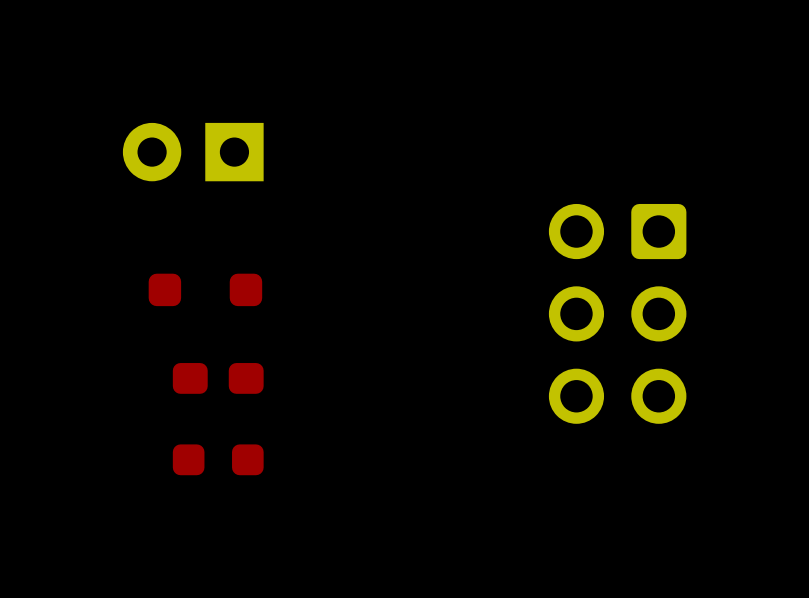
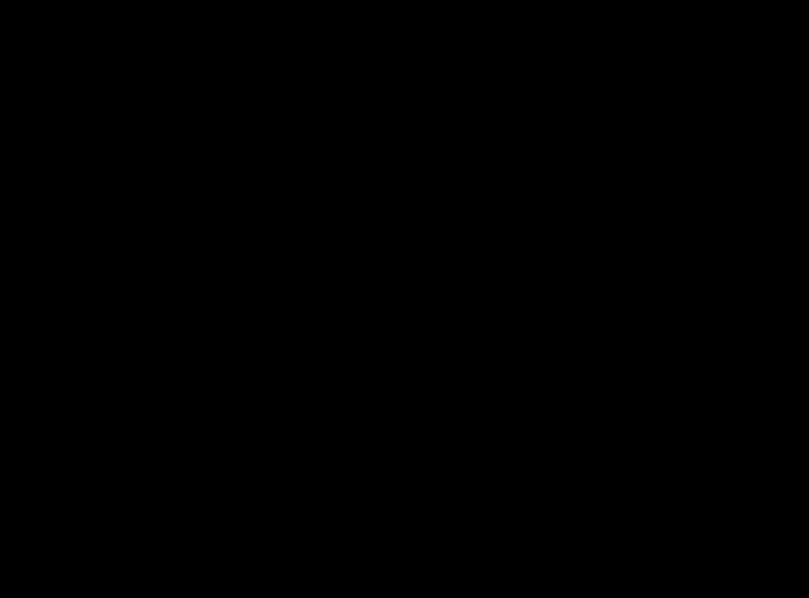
part: (193, 152) -> none
part: (205, 289) -> none
part: (617, 313) -> none
part: (218, 378) -> none
part: (218, 459) -> none

